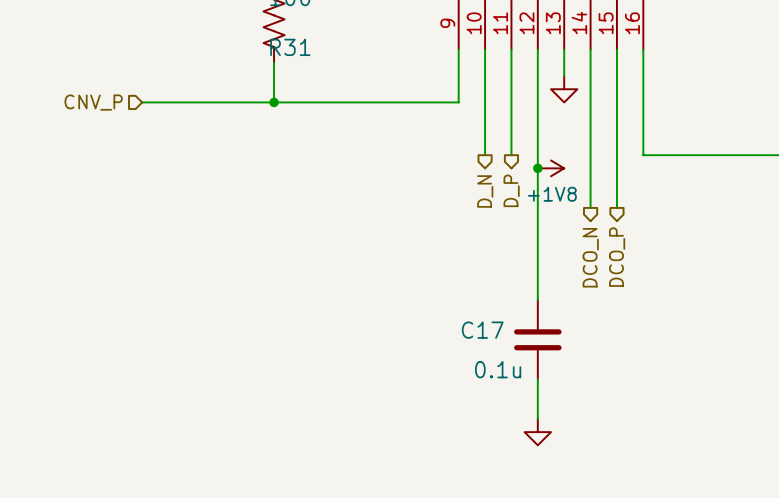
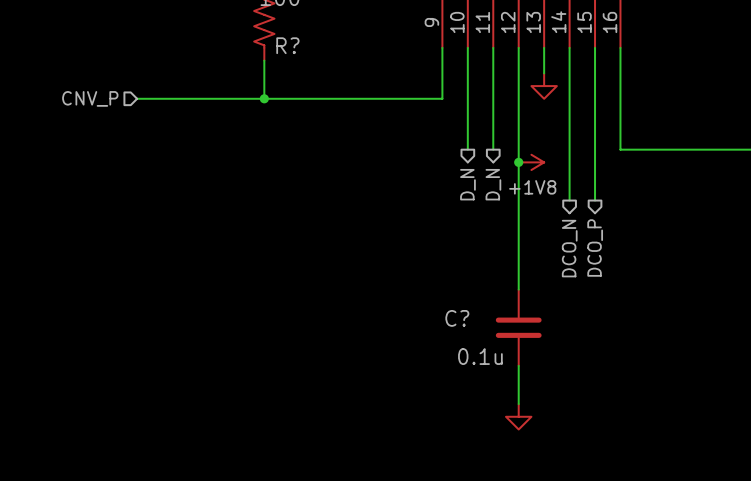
R31 name: R31 (290, 47) -> R? (287, 45)
hierarchical label: D_P (511, 190) -> D_N (493, 184)
C17 name: C17 (482, 330) -> C? (457, 318)

